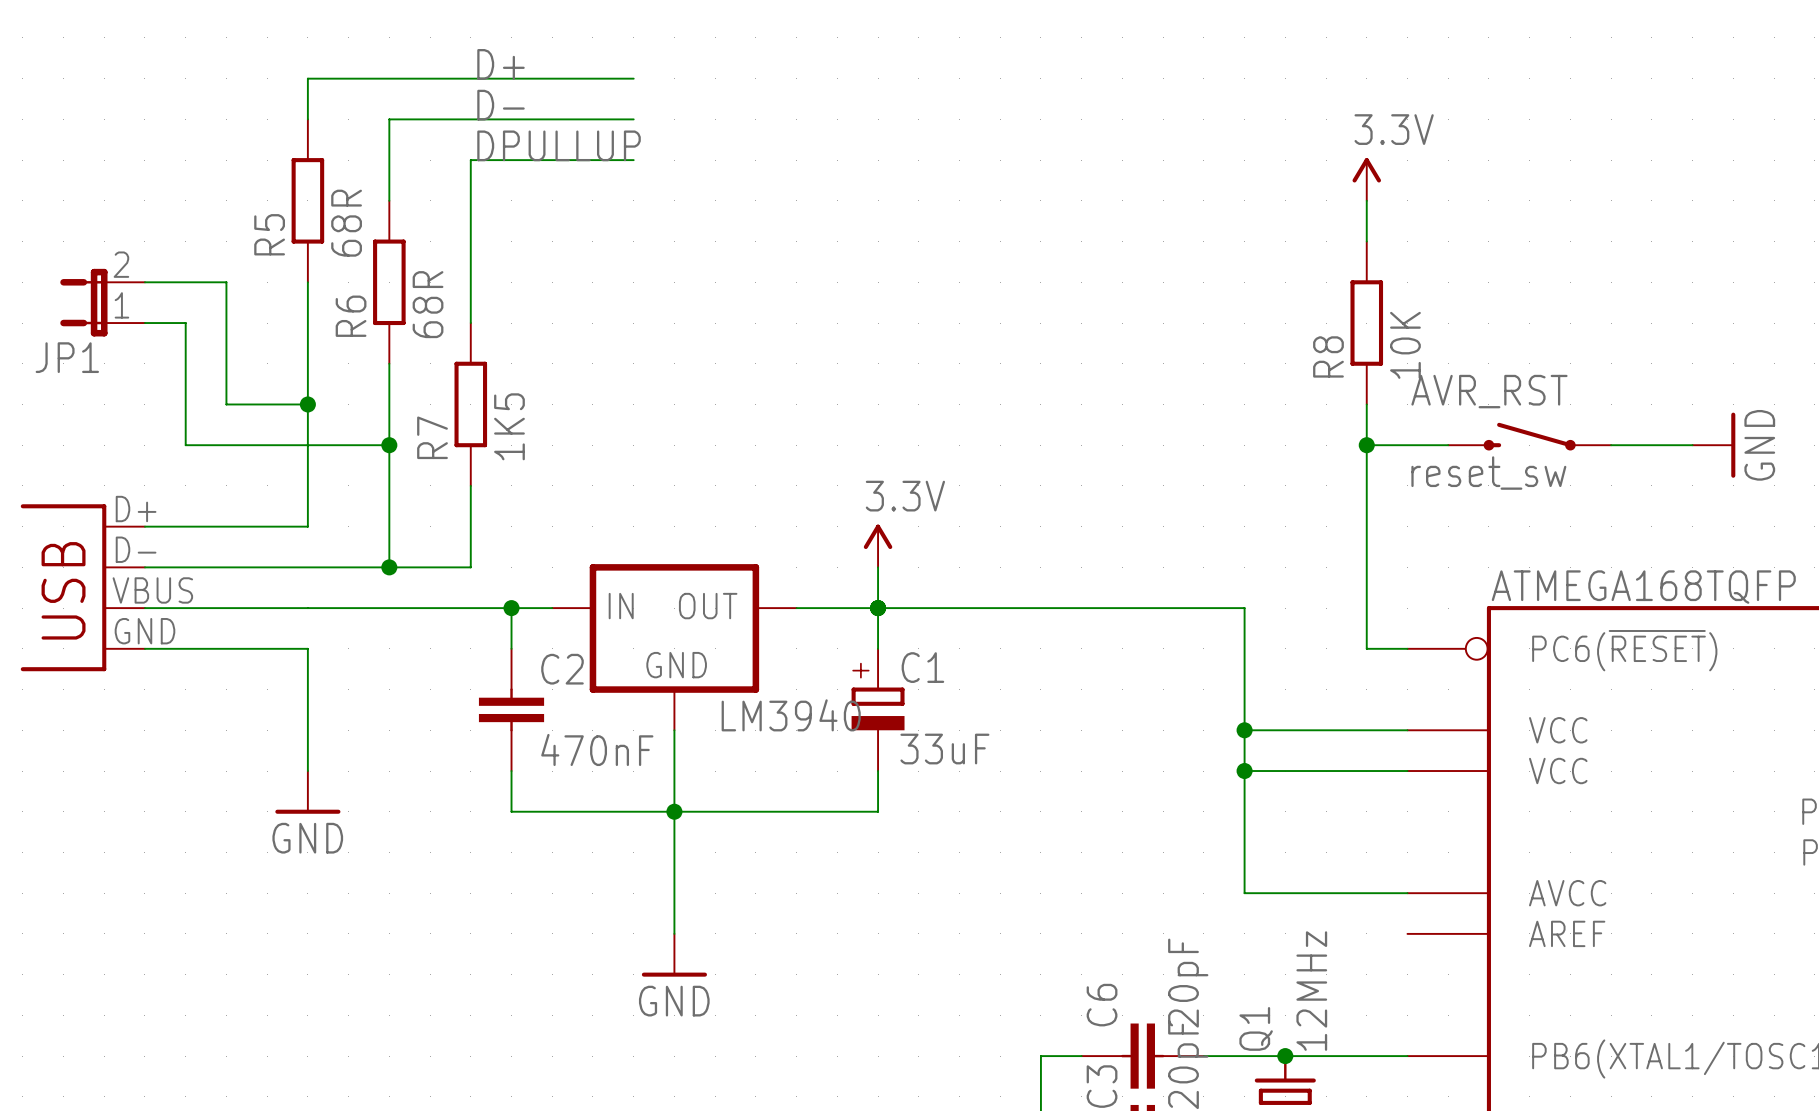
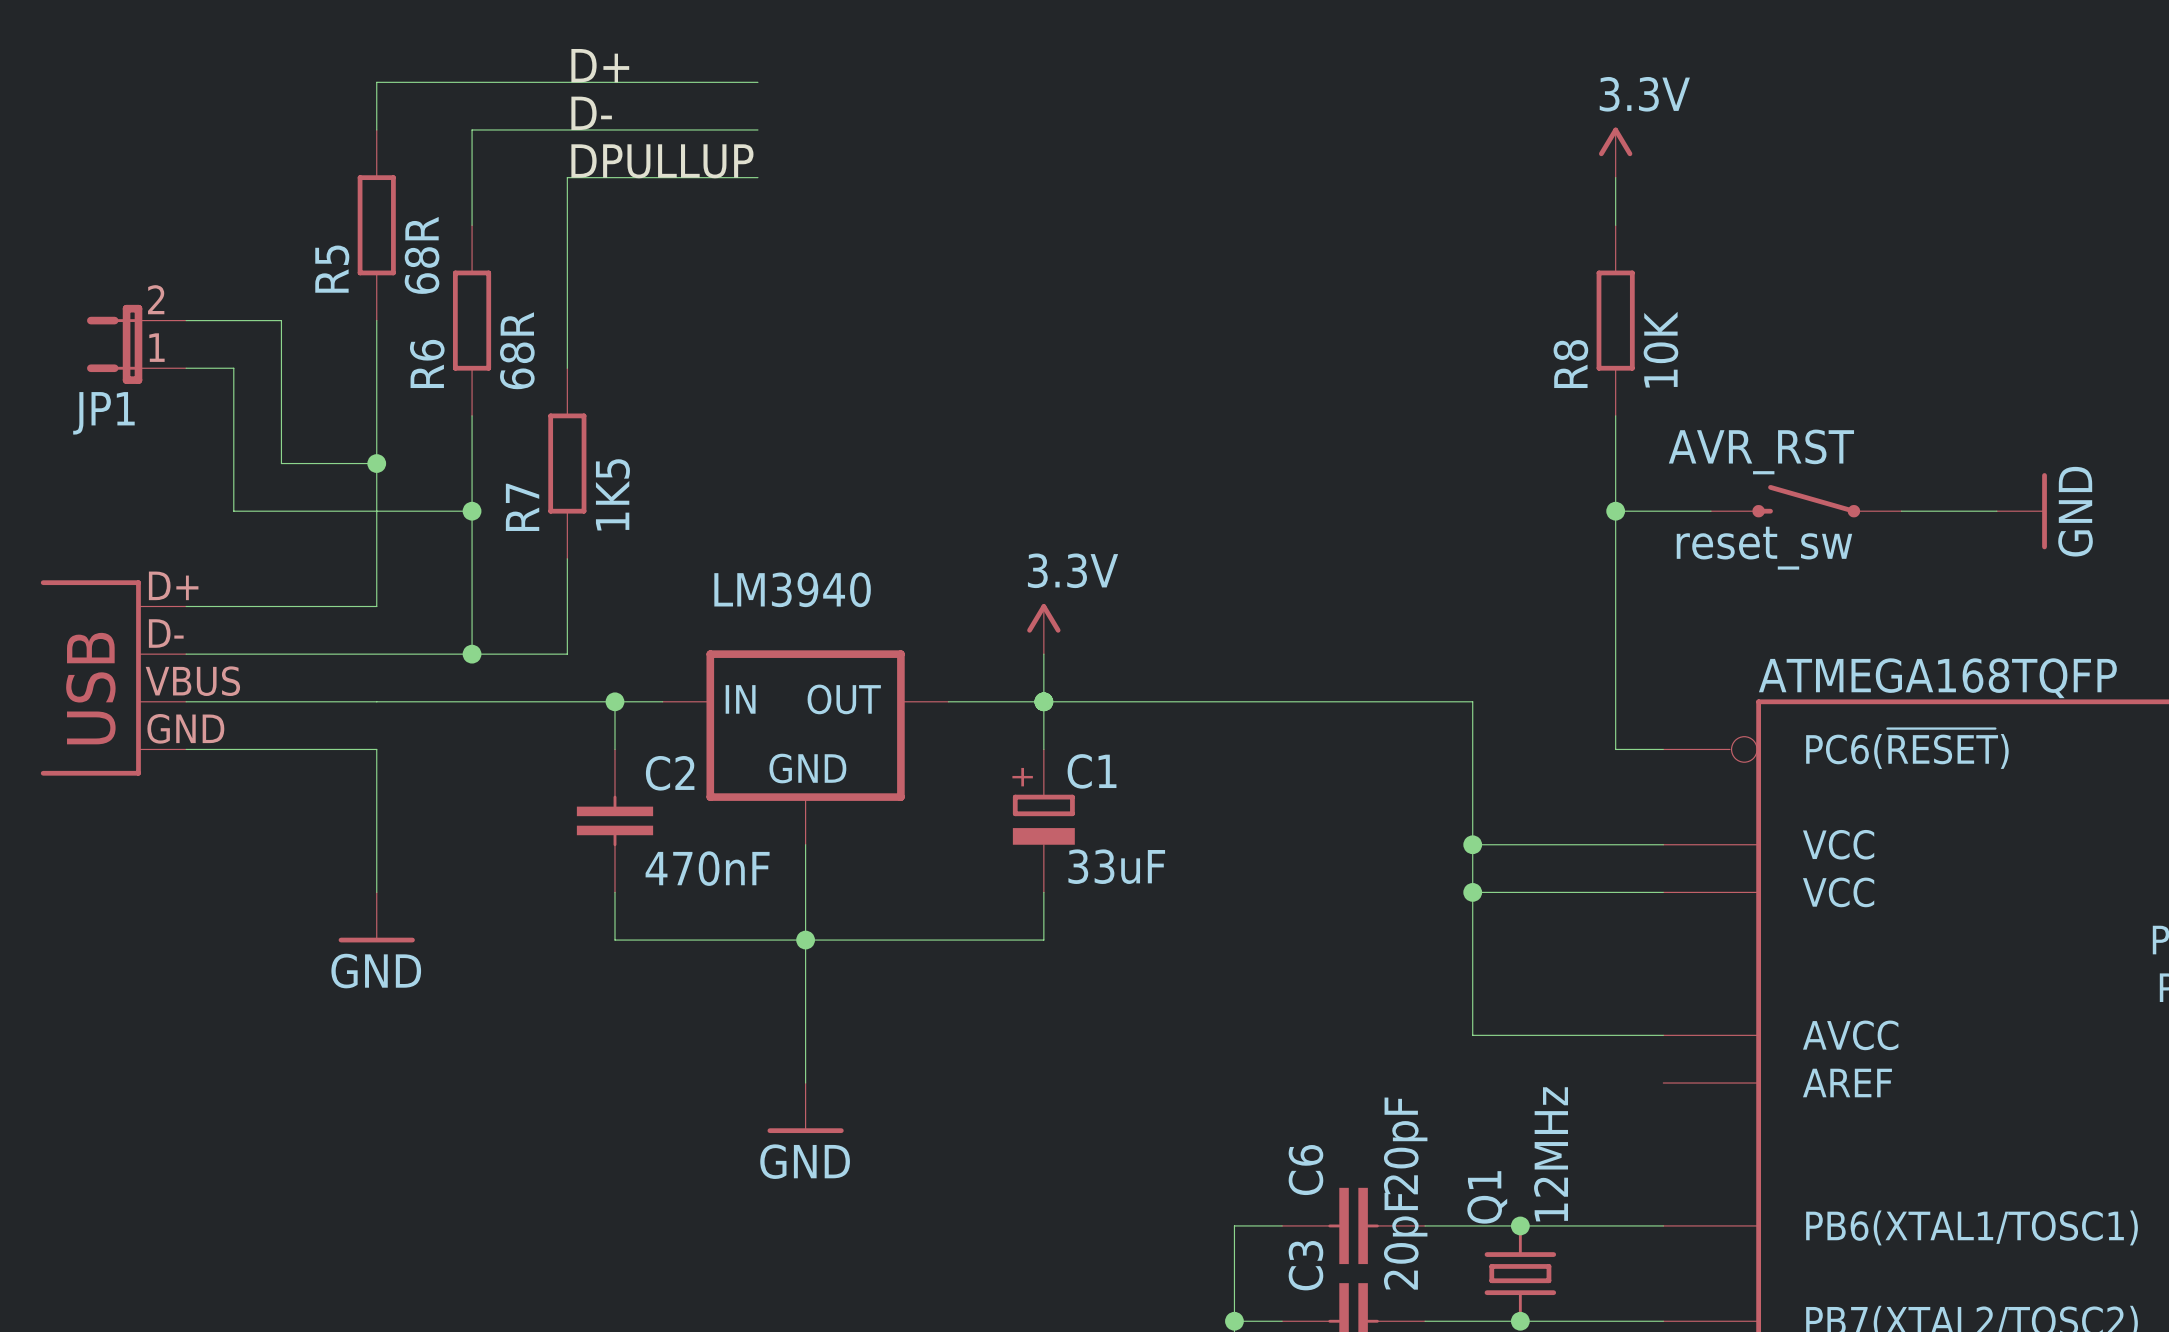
power symbol position: 3.3V (1366, 179) -> 3.3V (1615, 152)
R8 position: (1366, 323) -> (1615, 320)
LM3940 name position: LM3940 (791, 715) -> LM3940 (792, 589)

